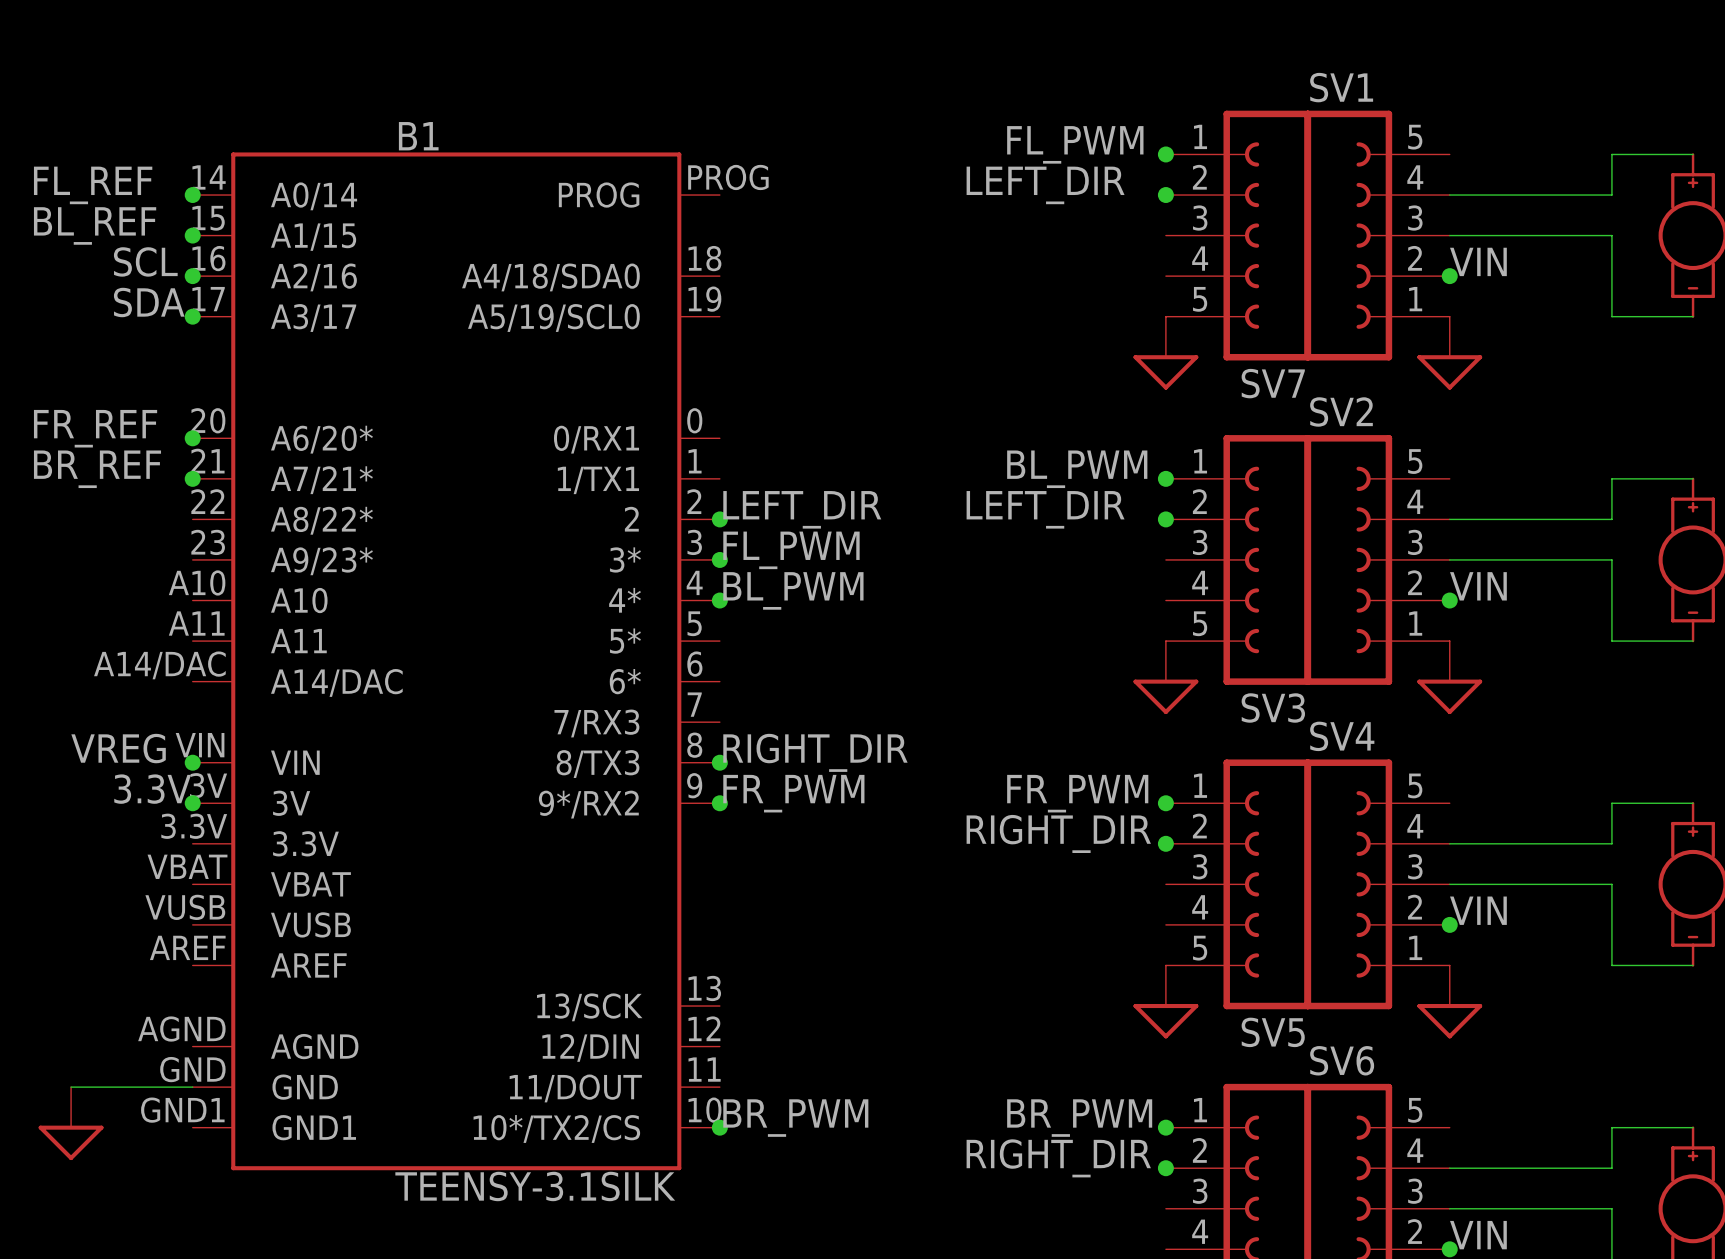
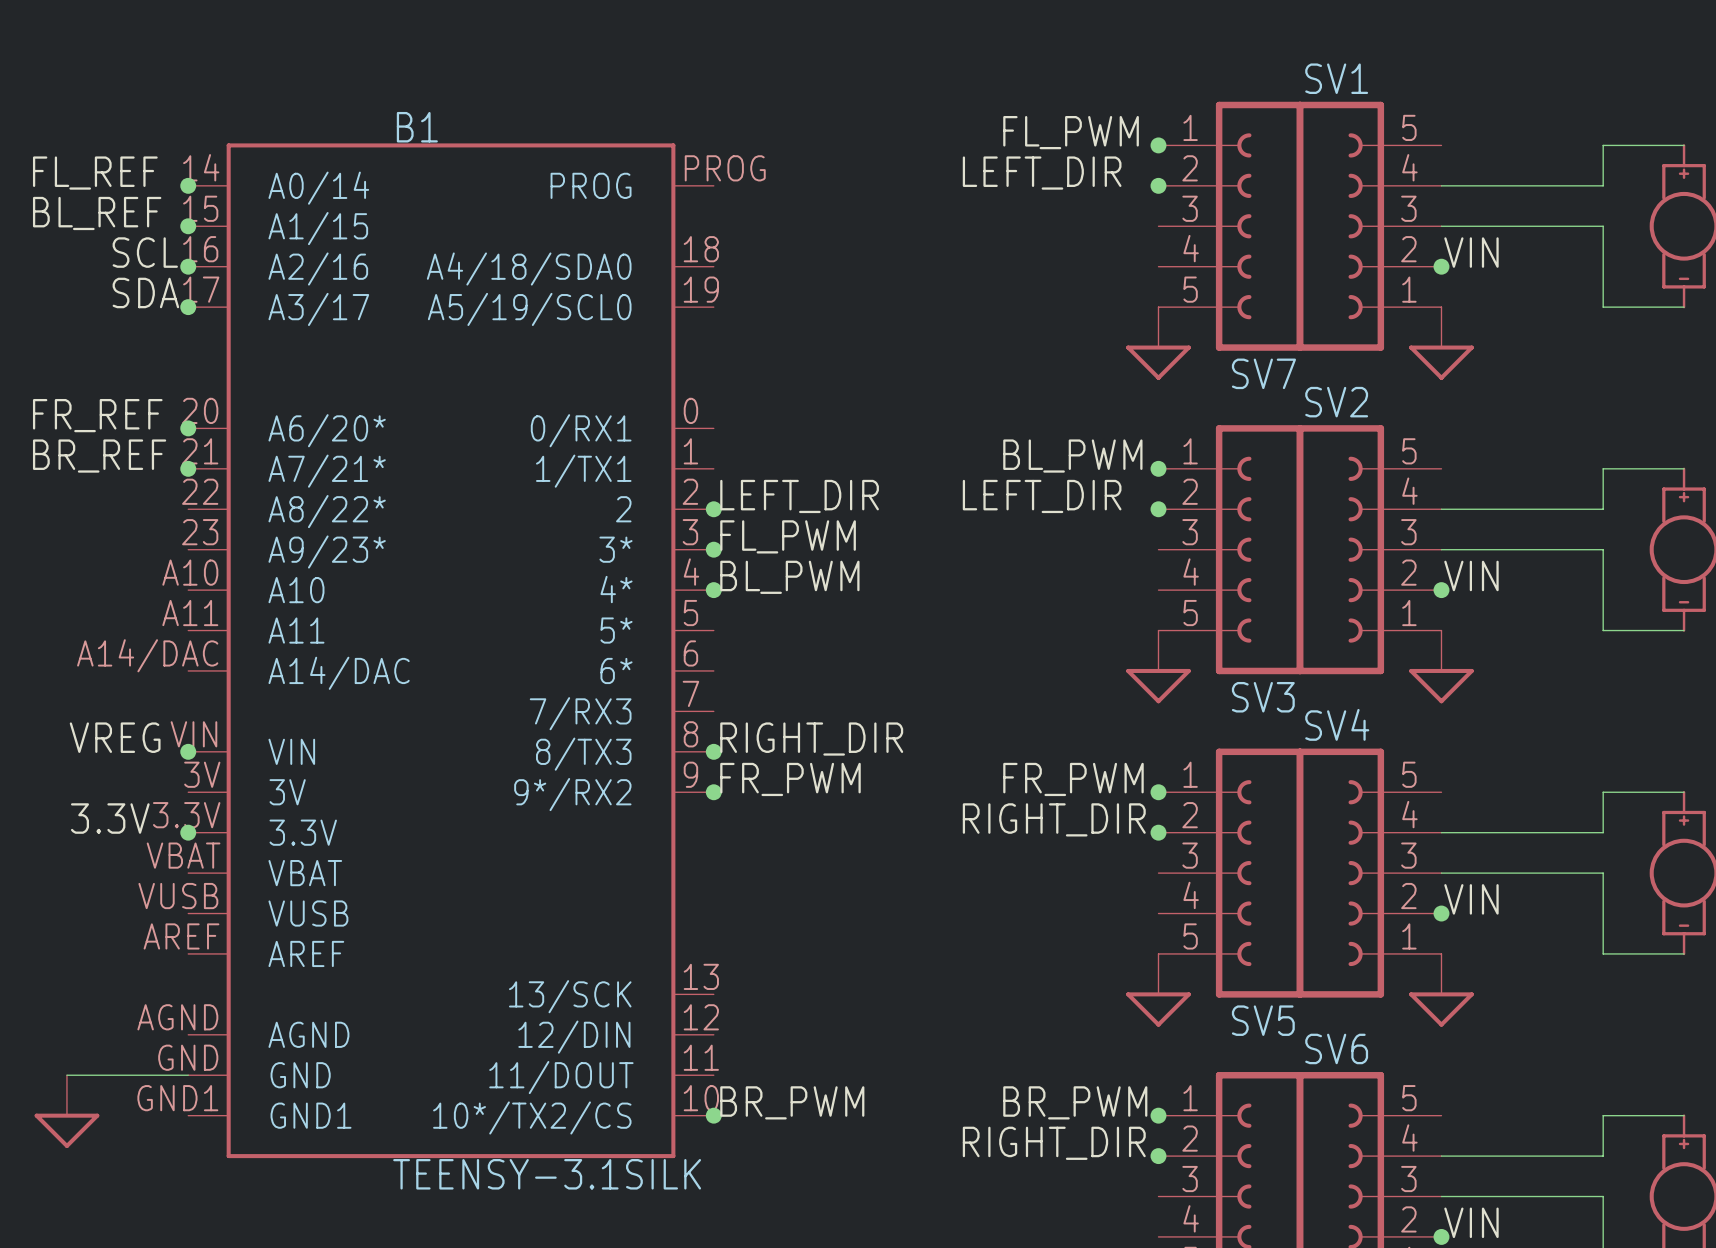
label position: 3.3V (152, 789) -> 3.3V (110, 818)
junction position: (192, 803) -> (188, 832)

